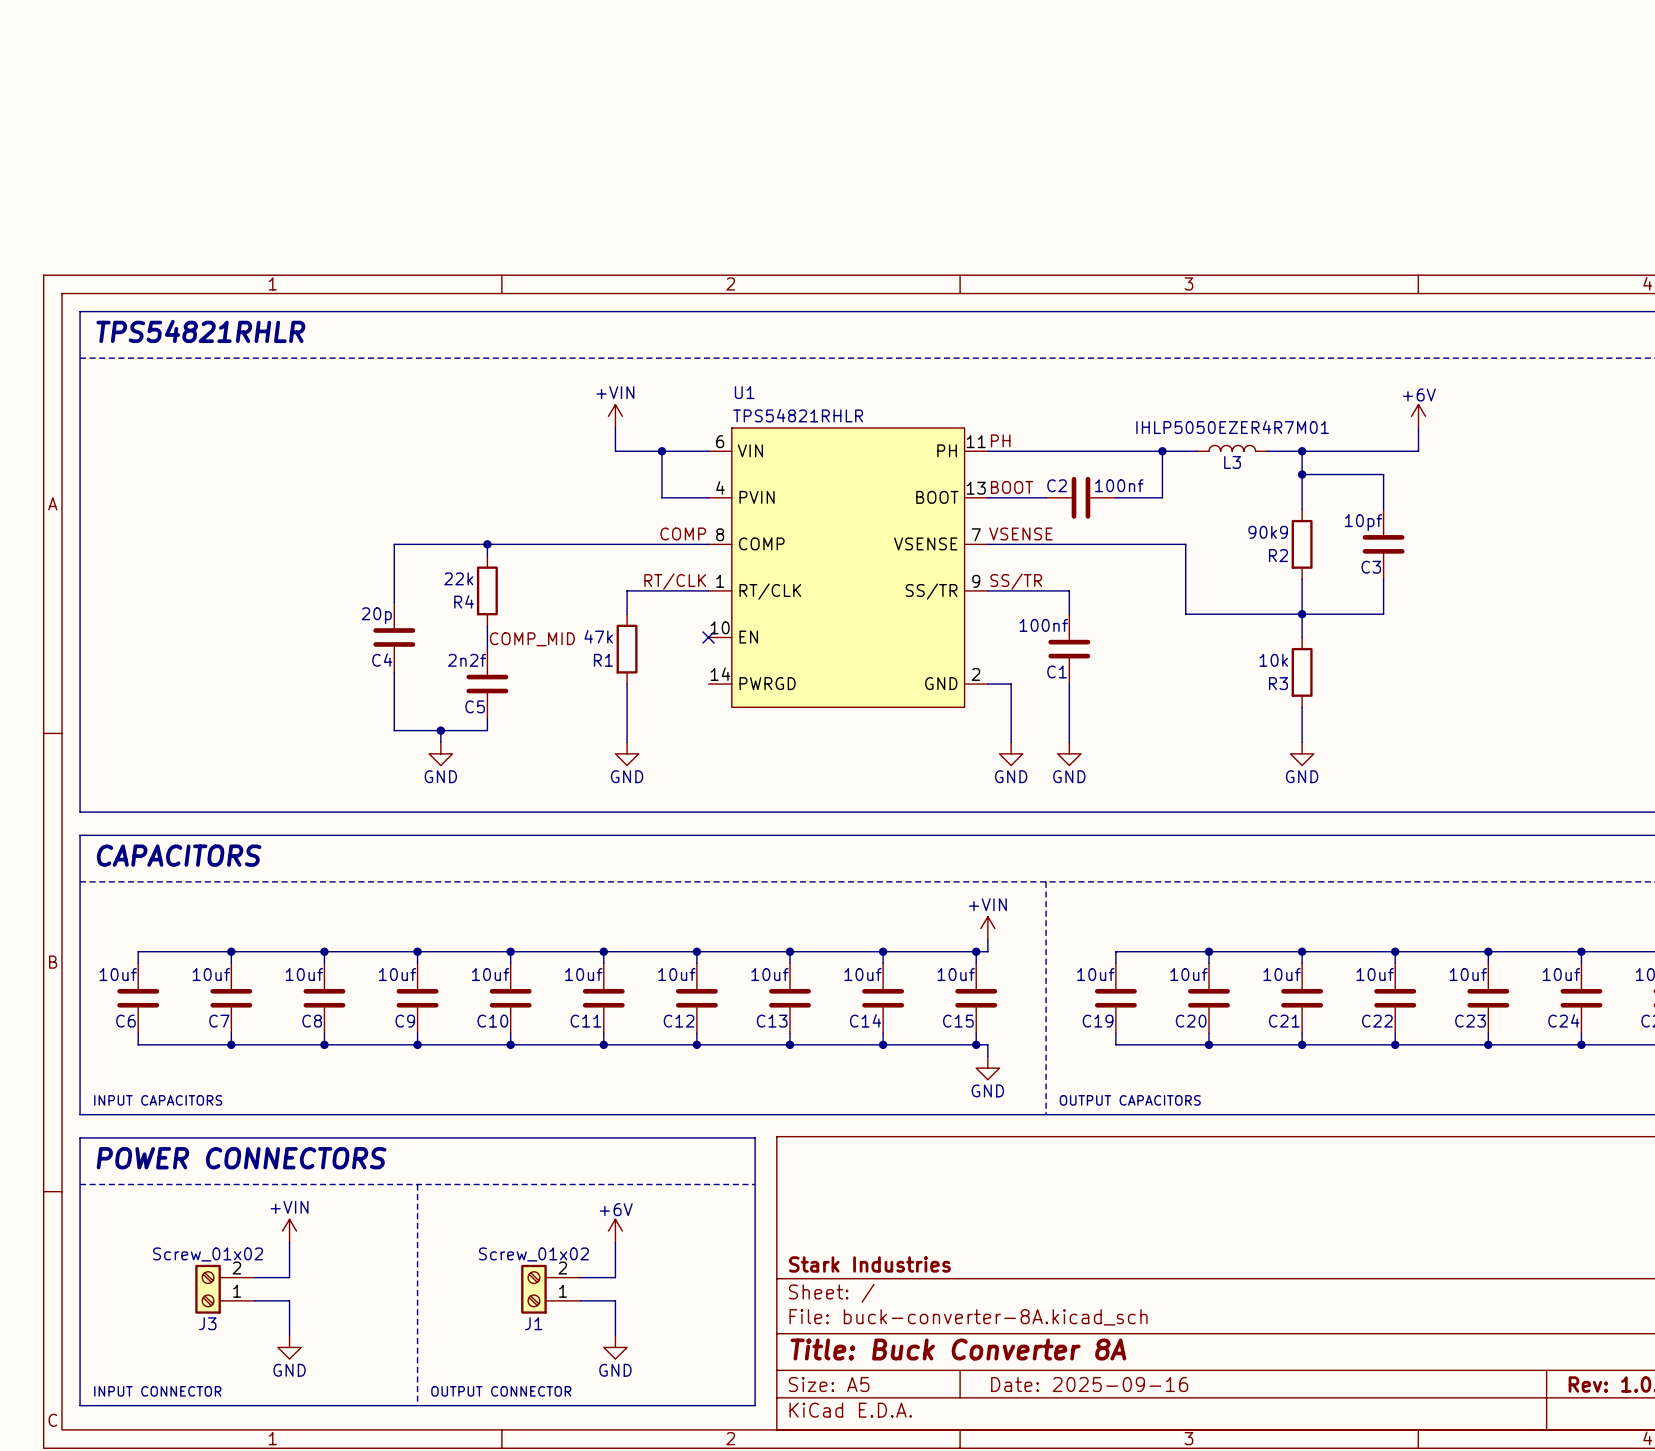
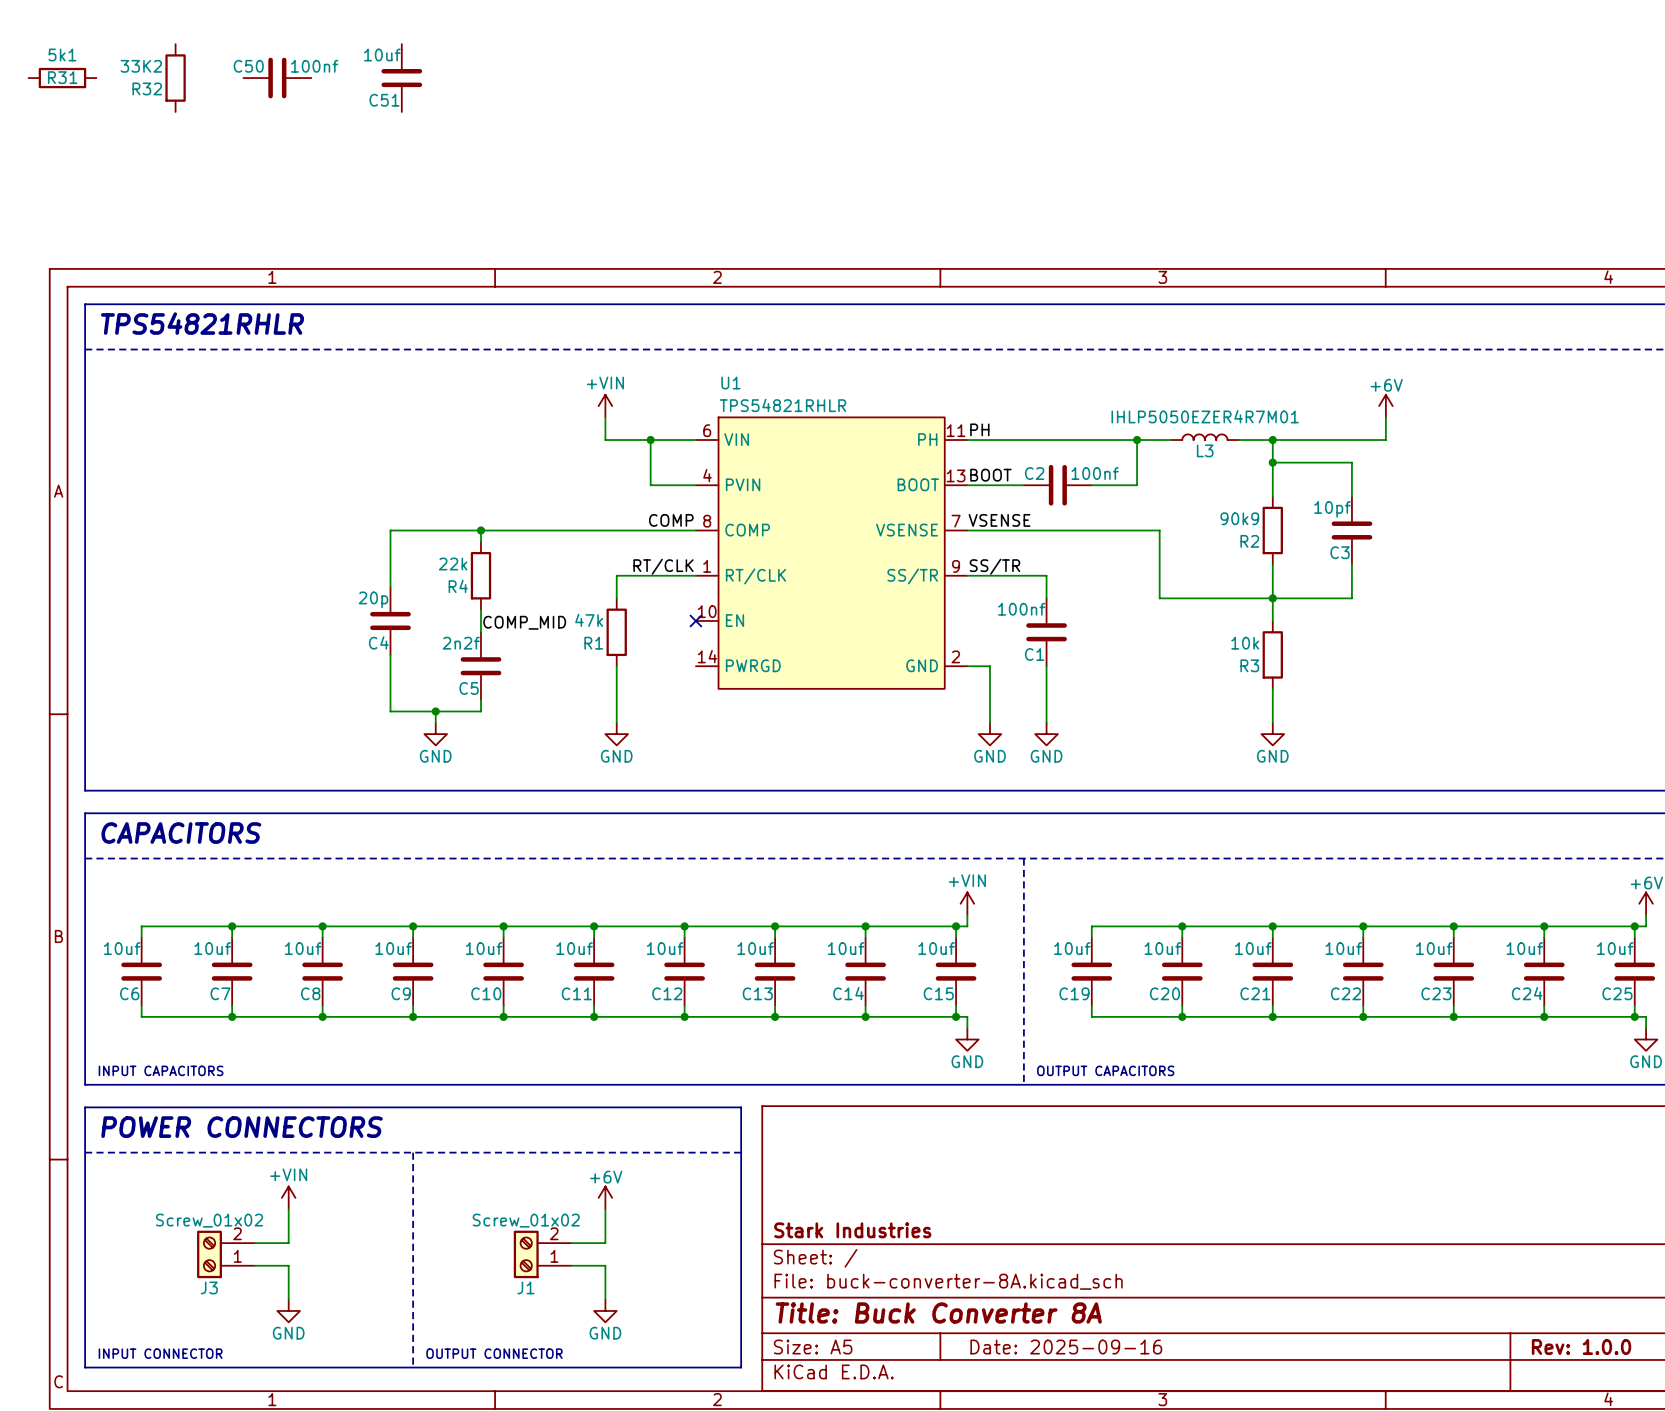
R31: none -> 5k1 (62, 78)
R32: none -> 33K2 (175, 78)
C50: none -> 100nf (277, 78)
C51: none -> 10uf (401, 78)

